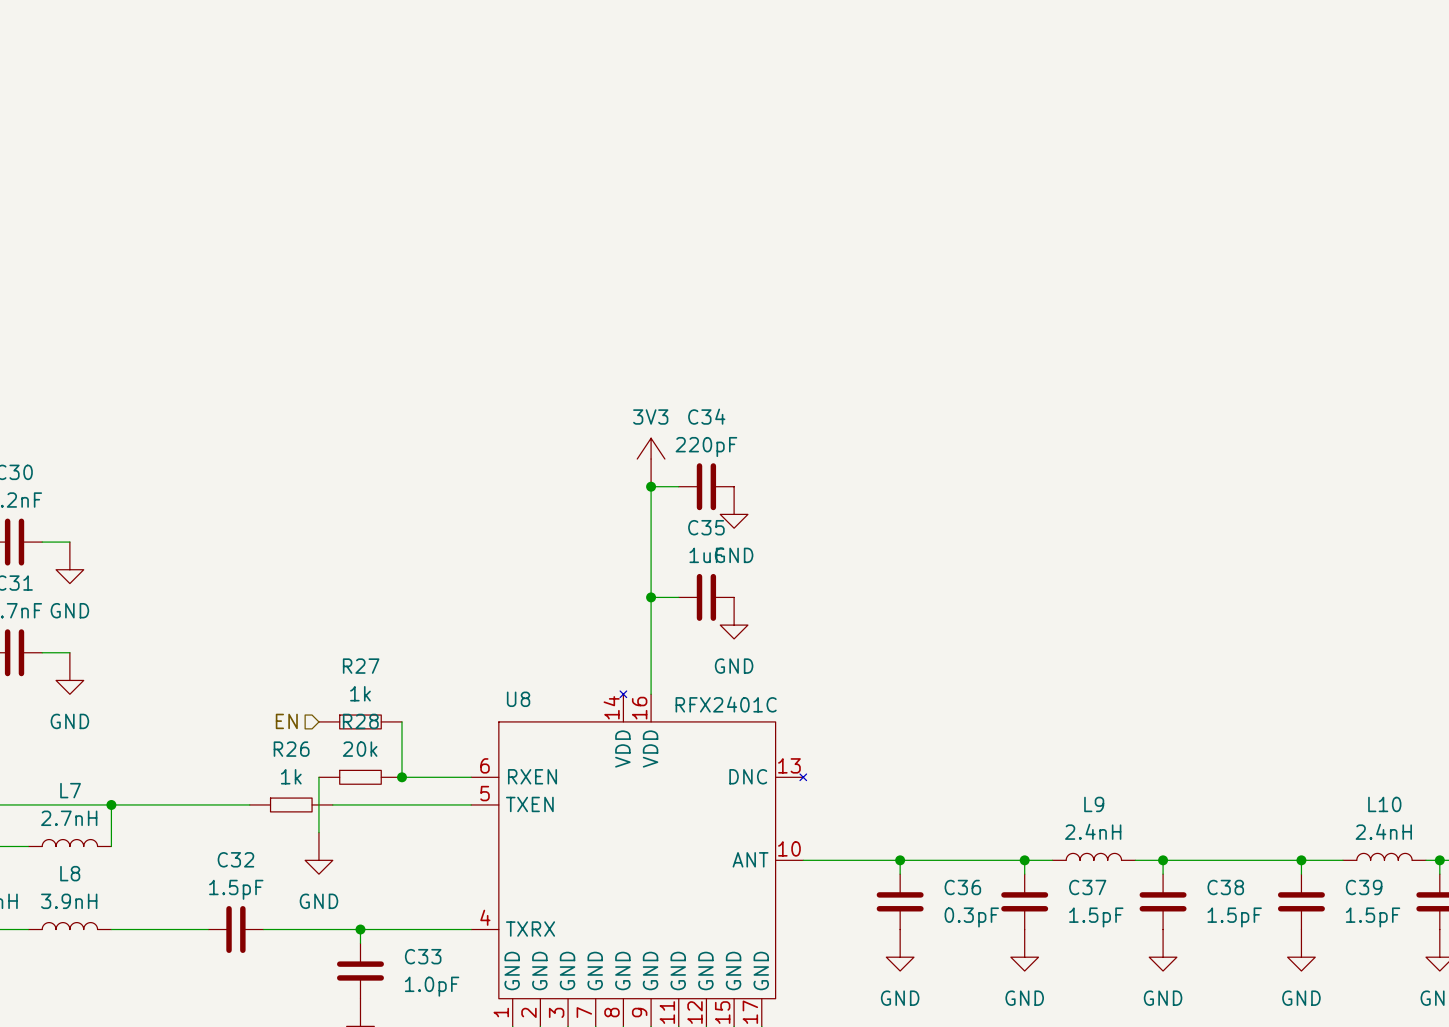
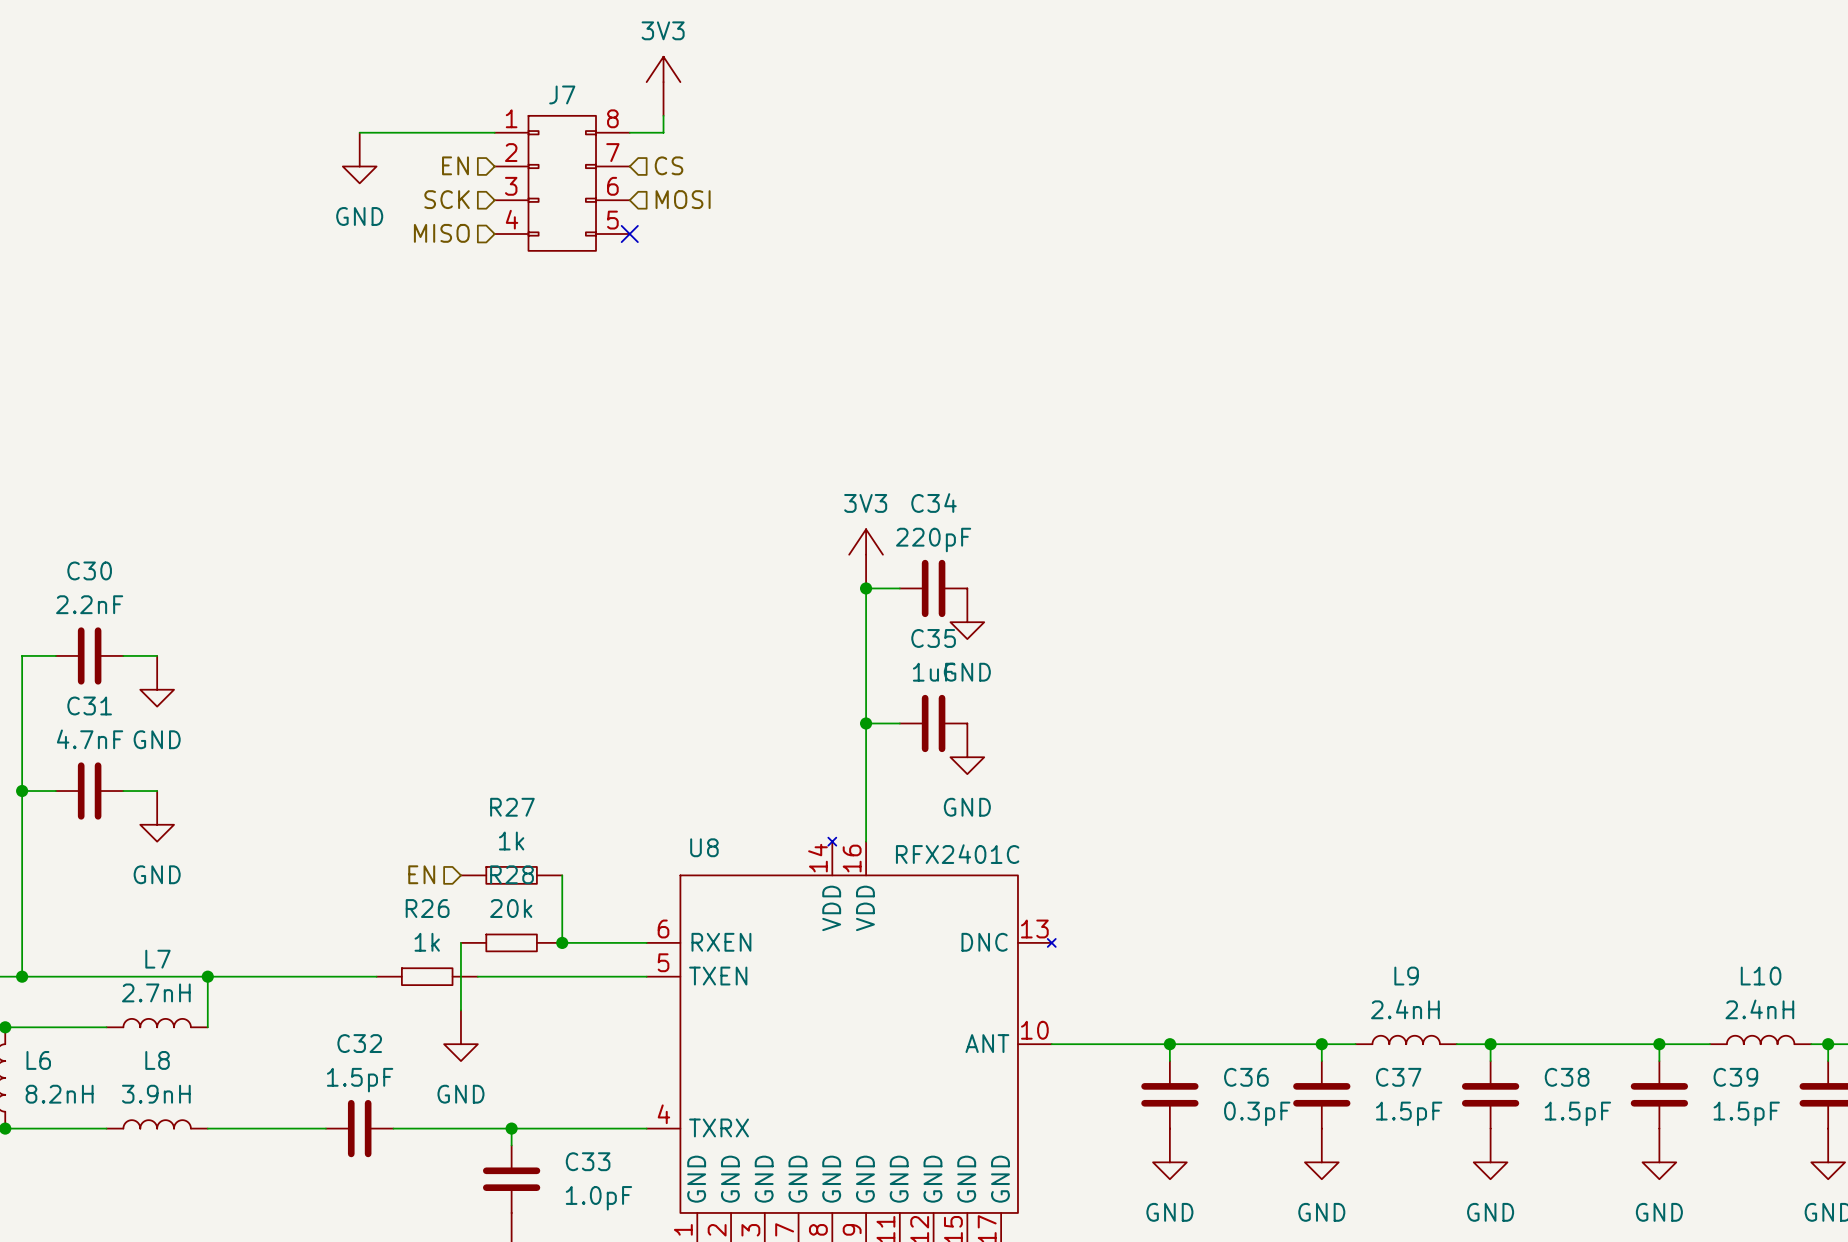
power symbol: none -> 3V3 (663, 86)
wire: none -> (663, 115) (663, 132) (629, 132)
wire: none -> (359, 132) (494, 132)
power symbol: none -> GND (359, 158)
hierarchical label: none -> EN (455, 165)
hierarchical label: none -> CS (669, 165)
J7: none -> (562, 183)
hierarchical label: none -> SCK (447, 199)
hierarchical label: none -> MOSI (683, 199)
hierarchical label: none -> MISO (441, 233)
no-connect mark: none -> (629, 234)

